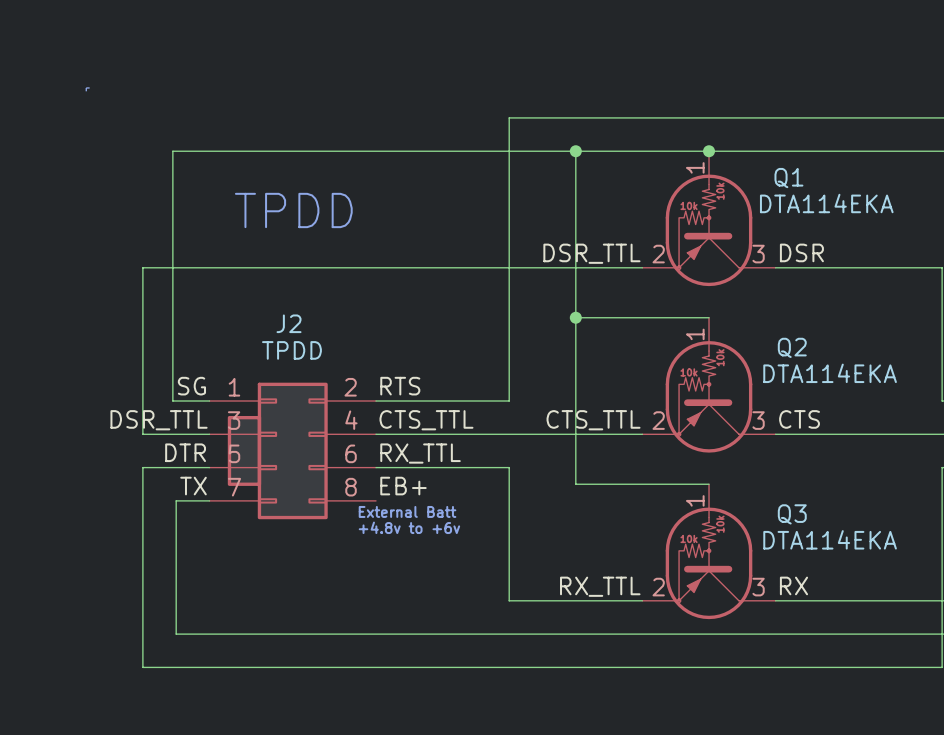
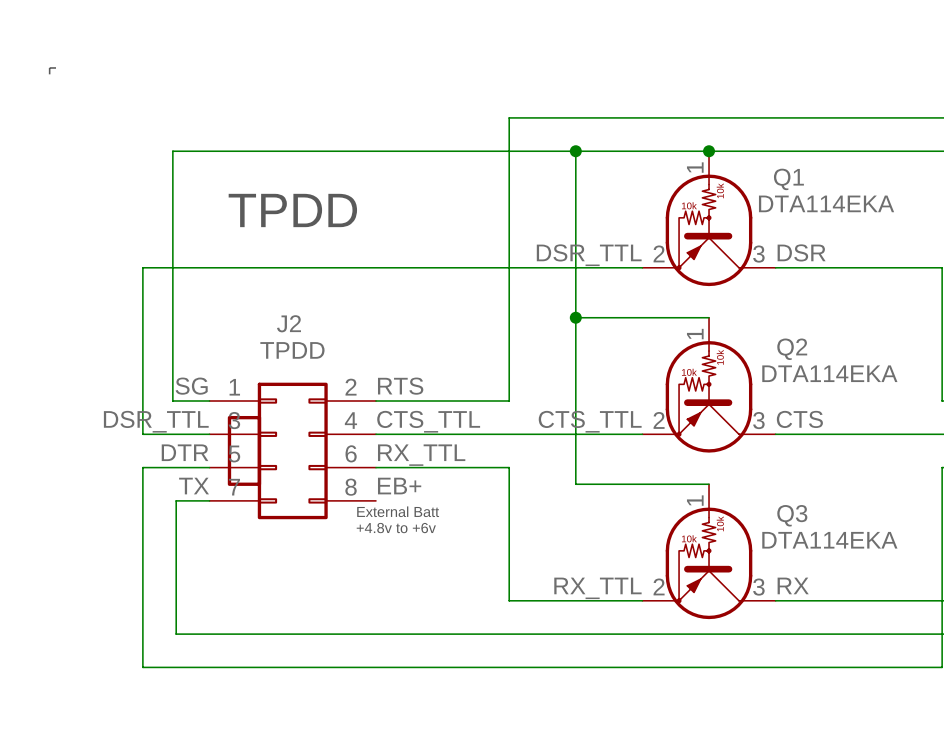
line: none -> (56, 67) (49, 67) (49, 74)
line: (89, 87) (86, 87) (86, 91) -> none

